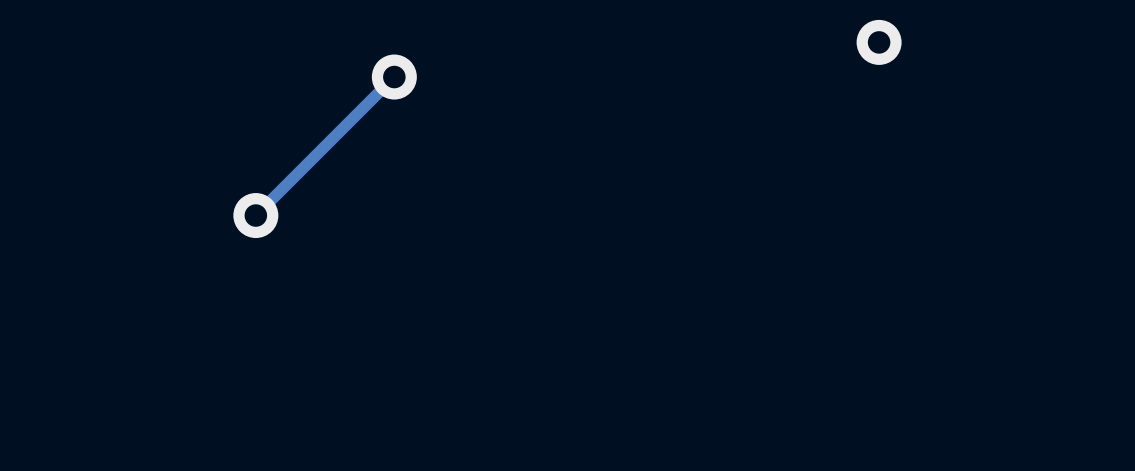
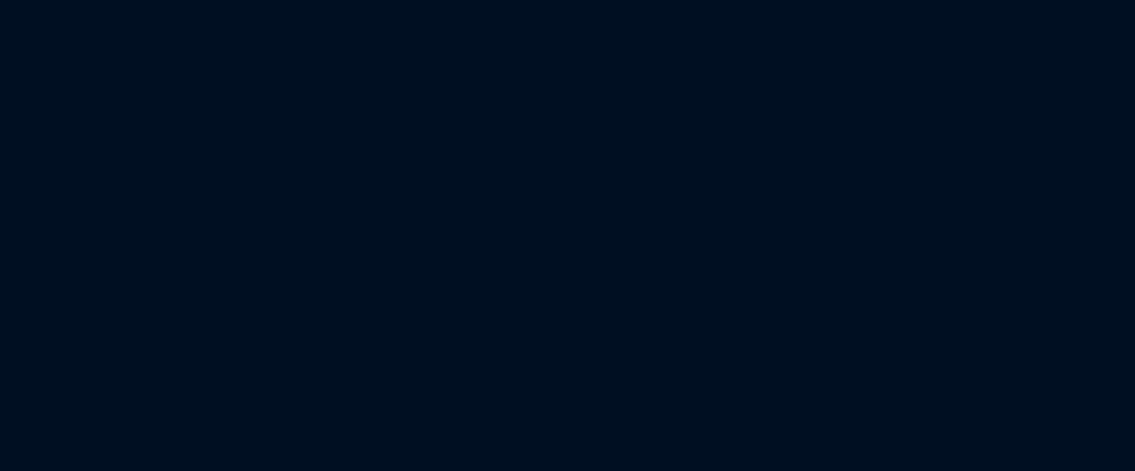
via: (879, 42) -> none
track: (394, 77) (255, 215) -> none
via: (394, 77) -> none
via: (255, 215) -> none

